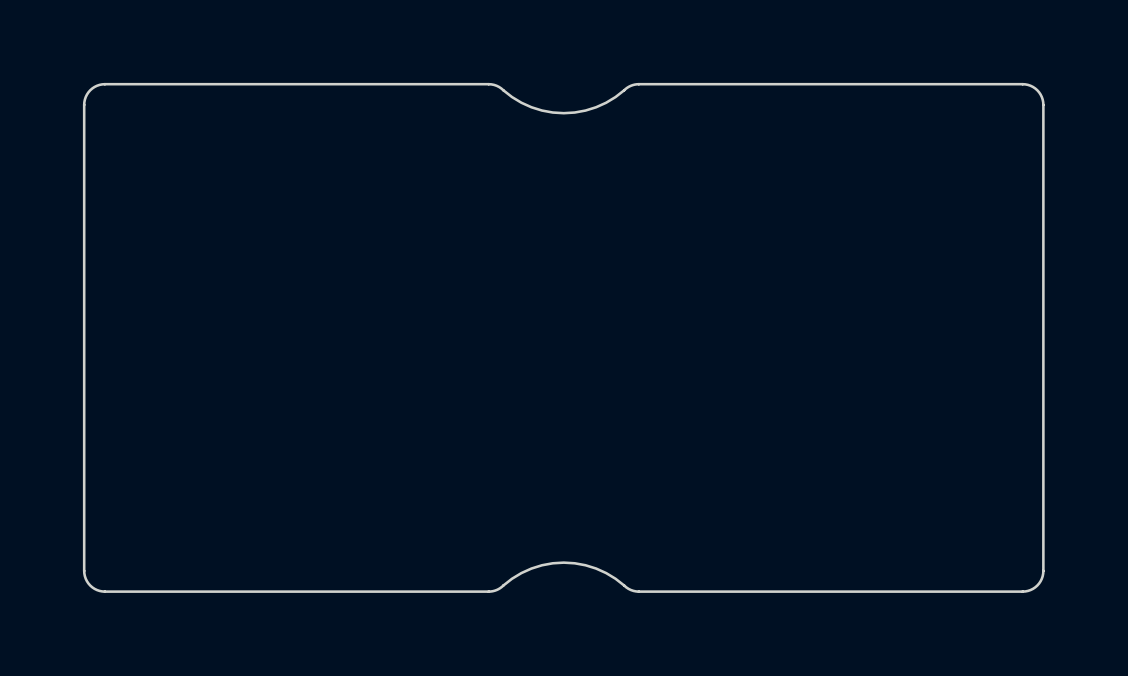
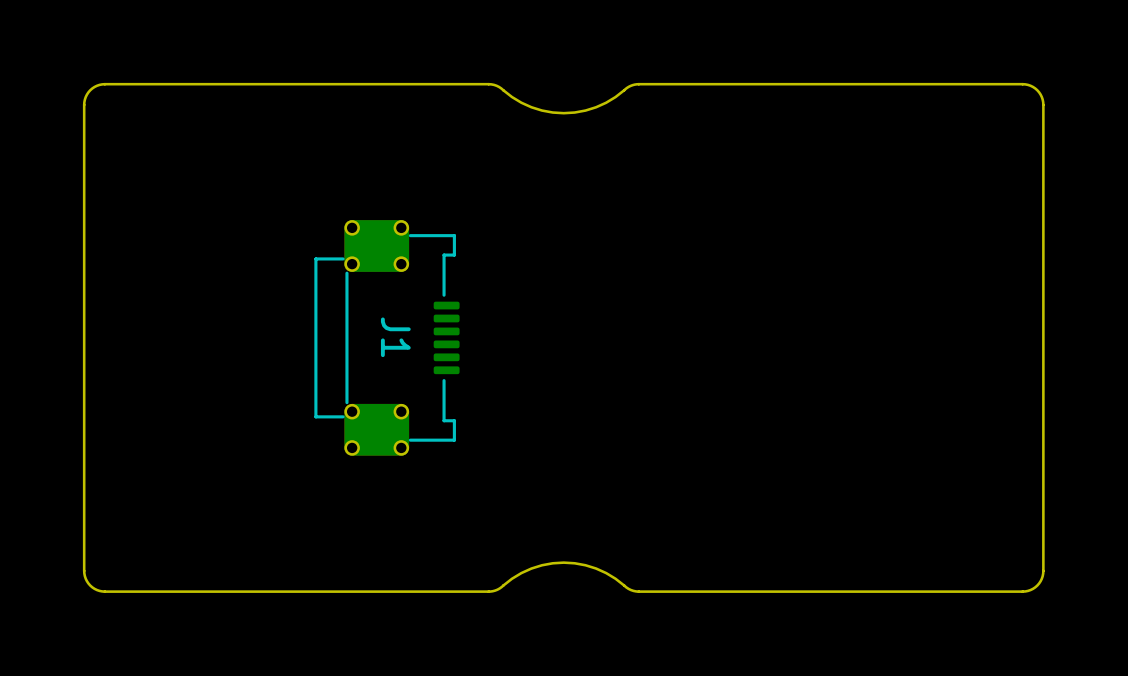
J1: none -> (386, 337)

